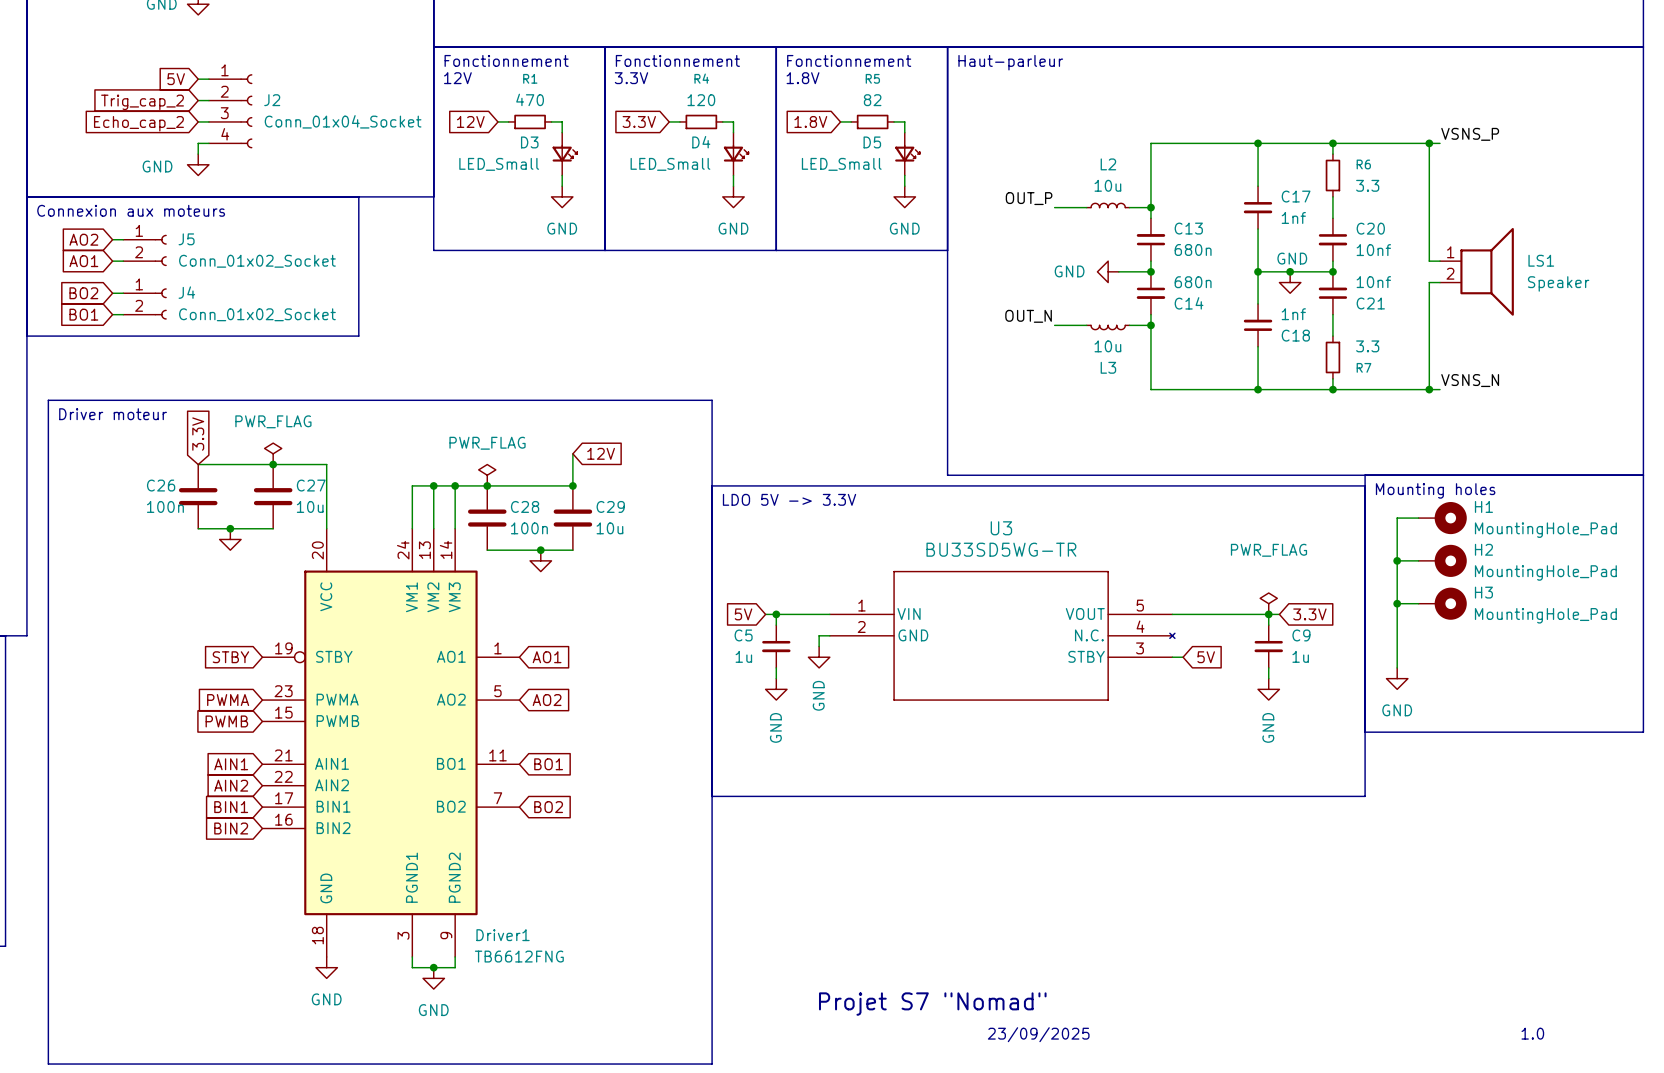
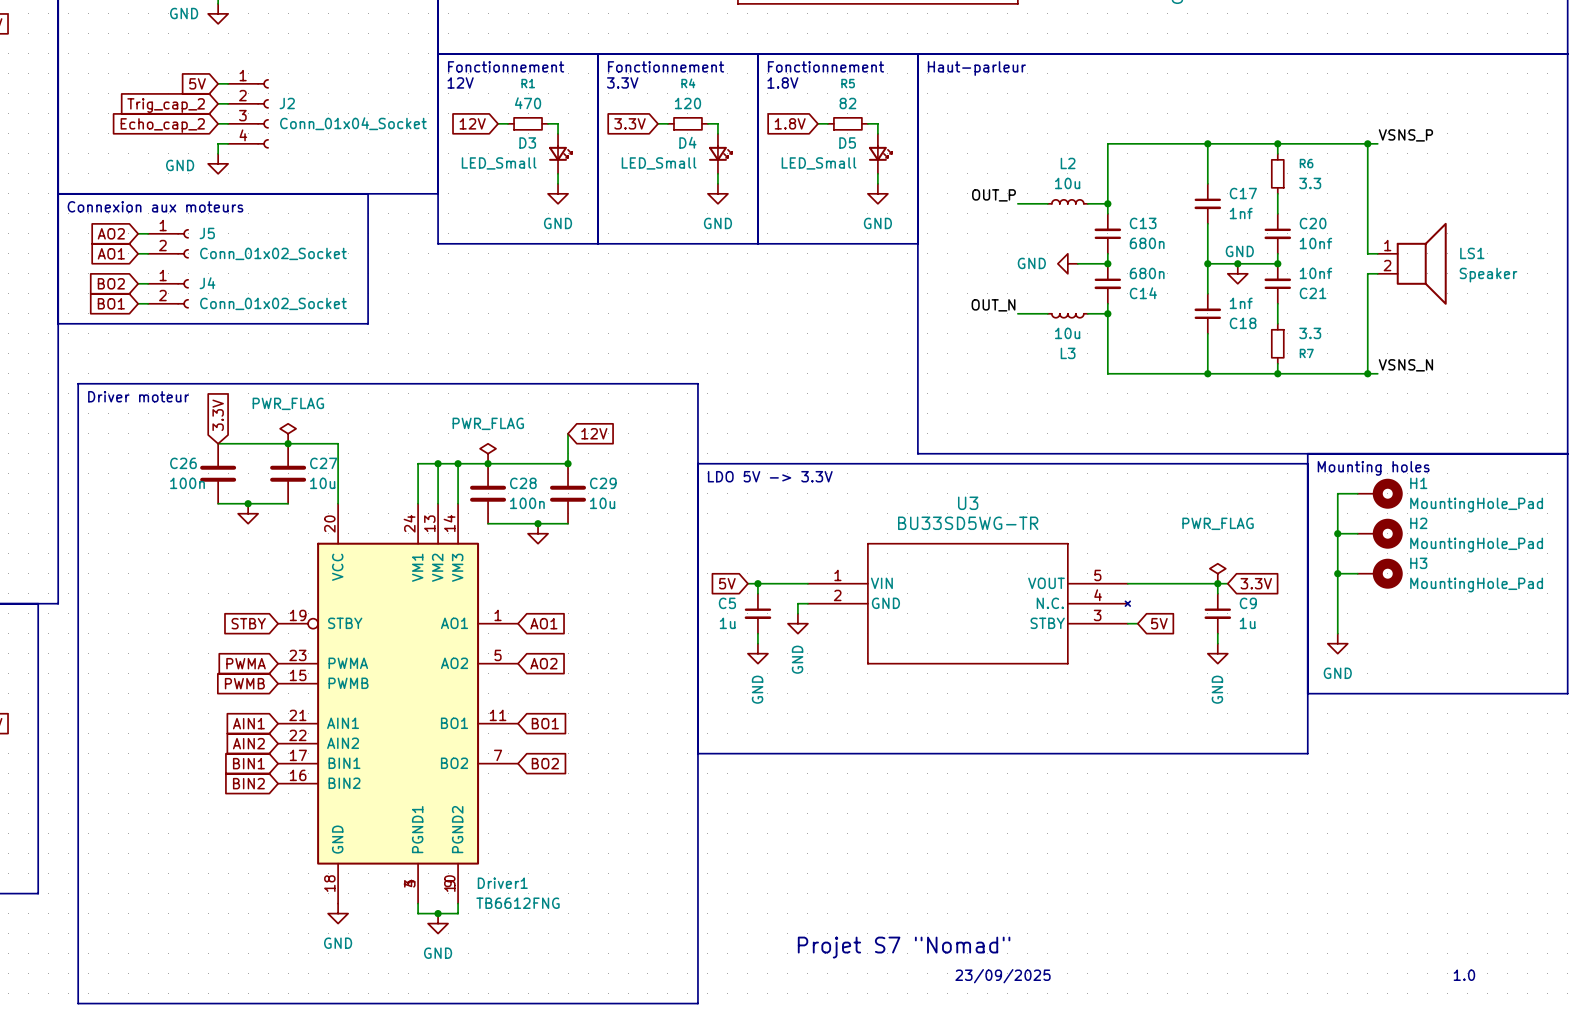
Driver1 symbol: [262, 528, 520, 957] -> [278, 503, 519, 904]

